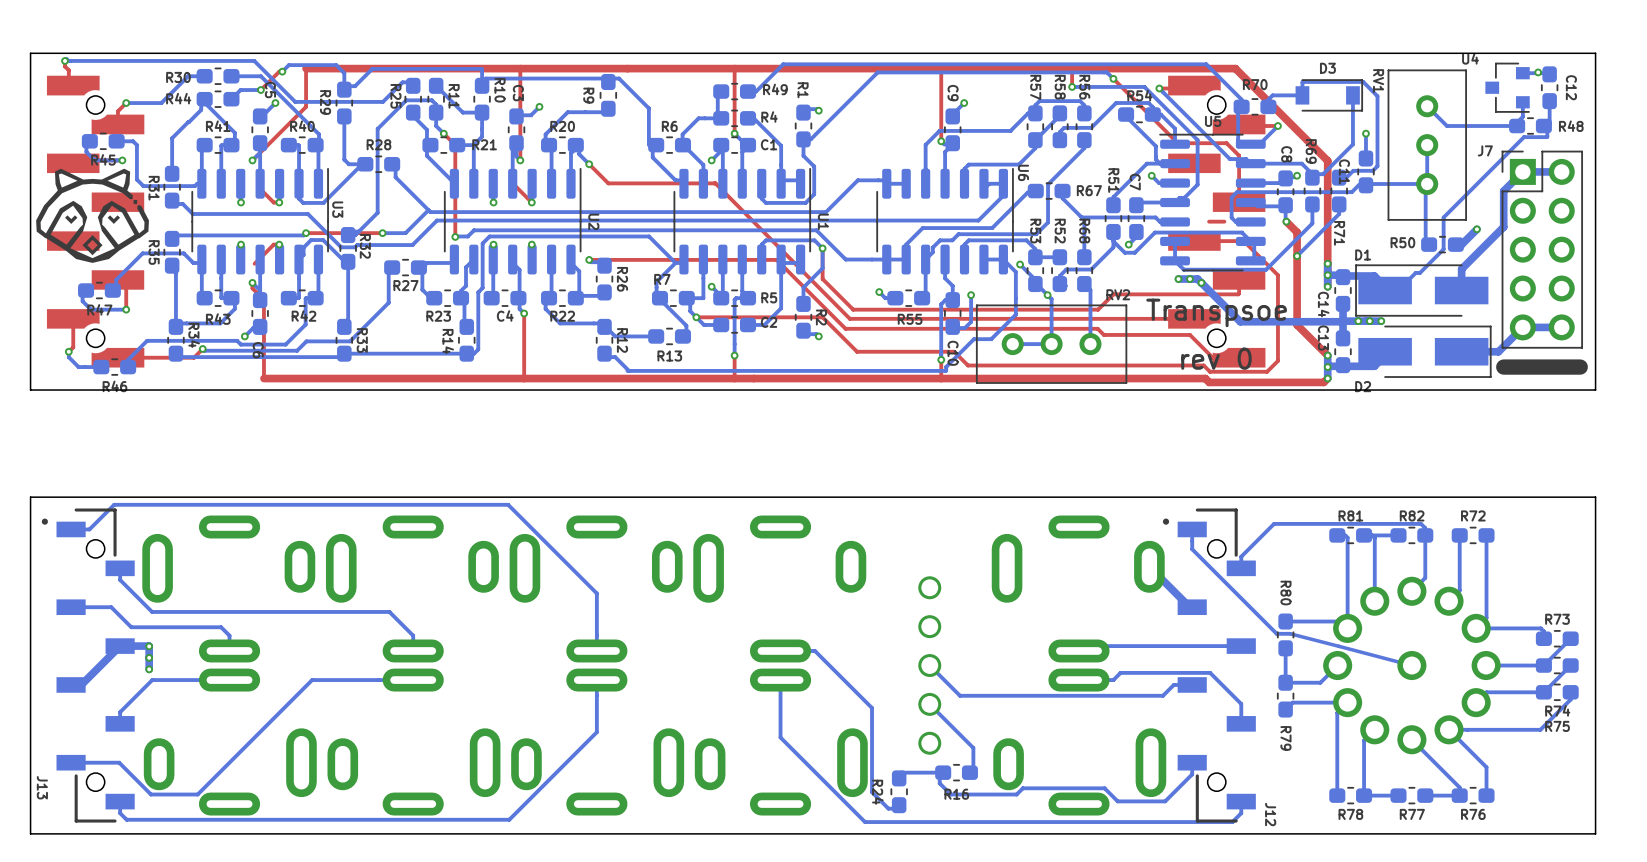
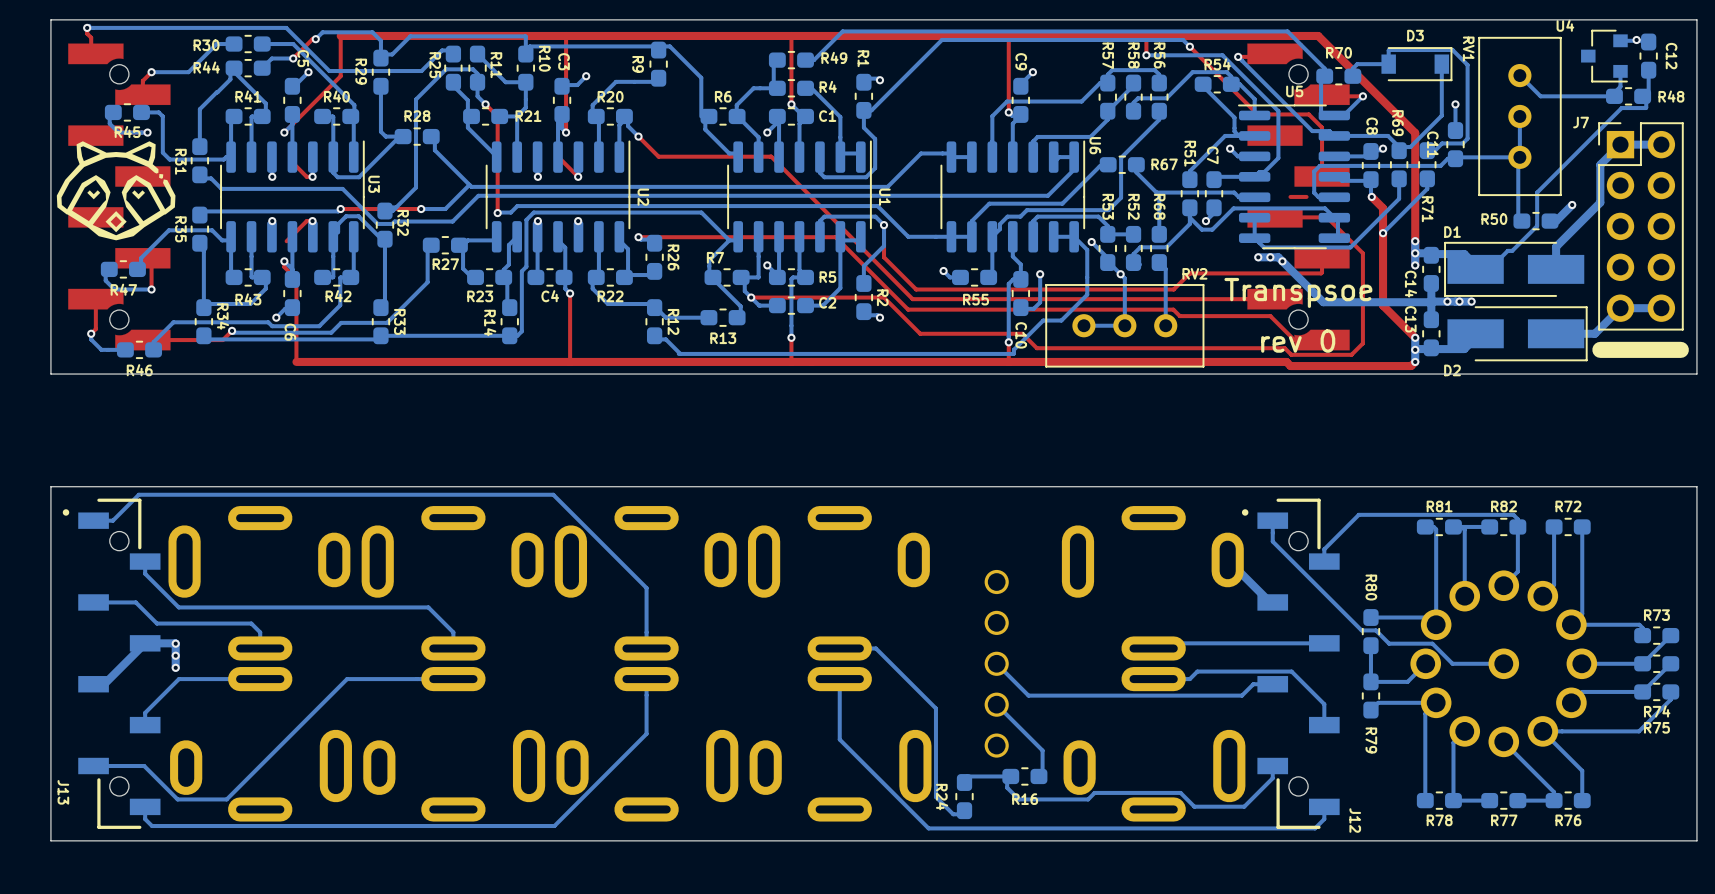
bottom track: (1290, 633) (1411, 665) -> (1375, 630) (1389, 643) (1432, 643) (1452, 663) (1503, 663)

